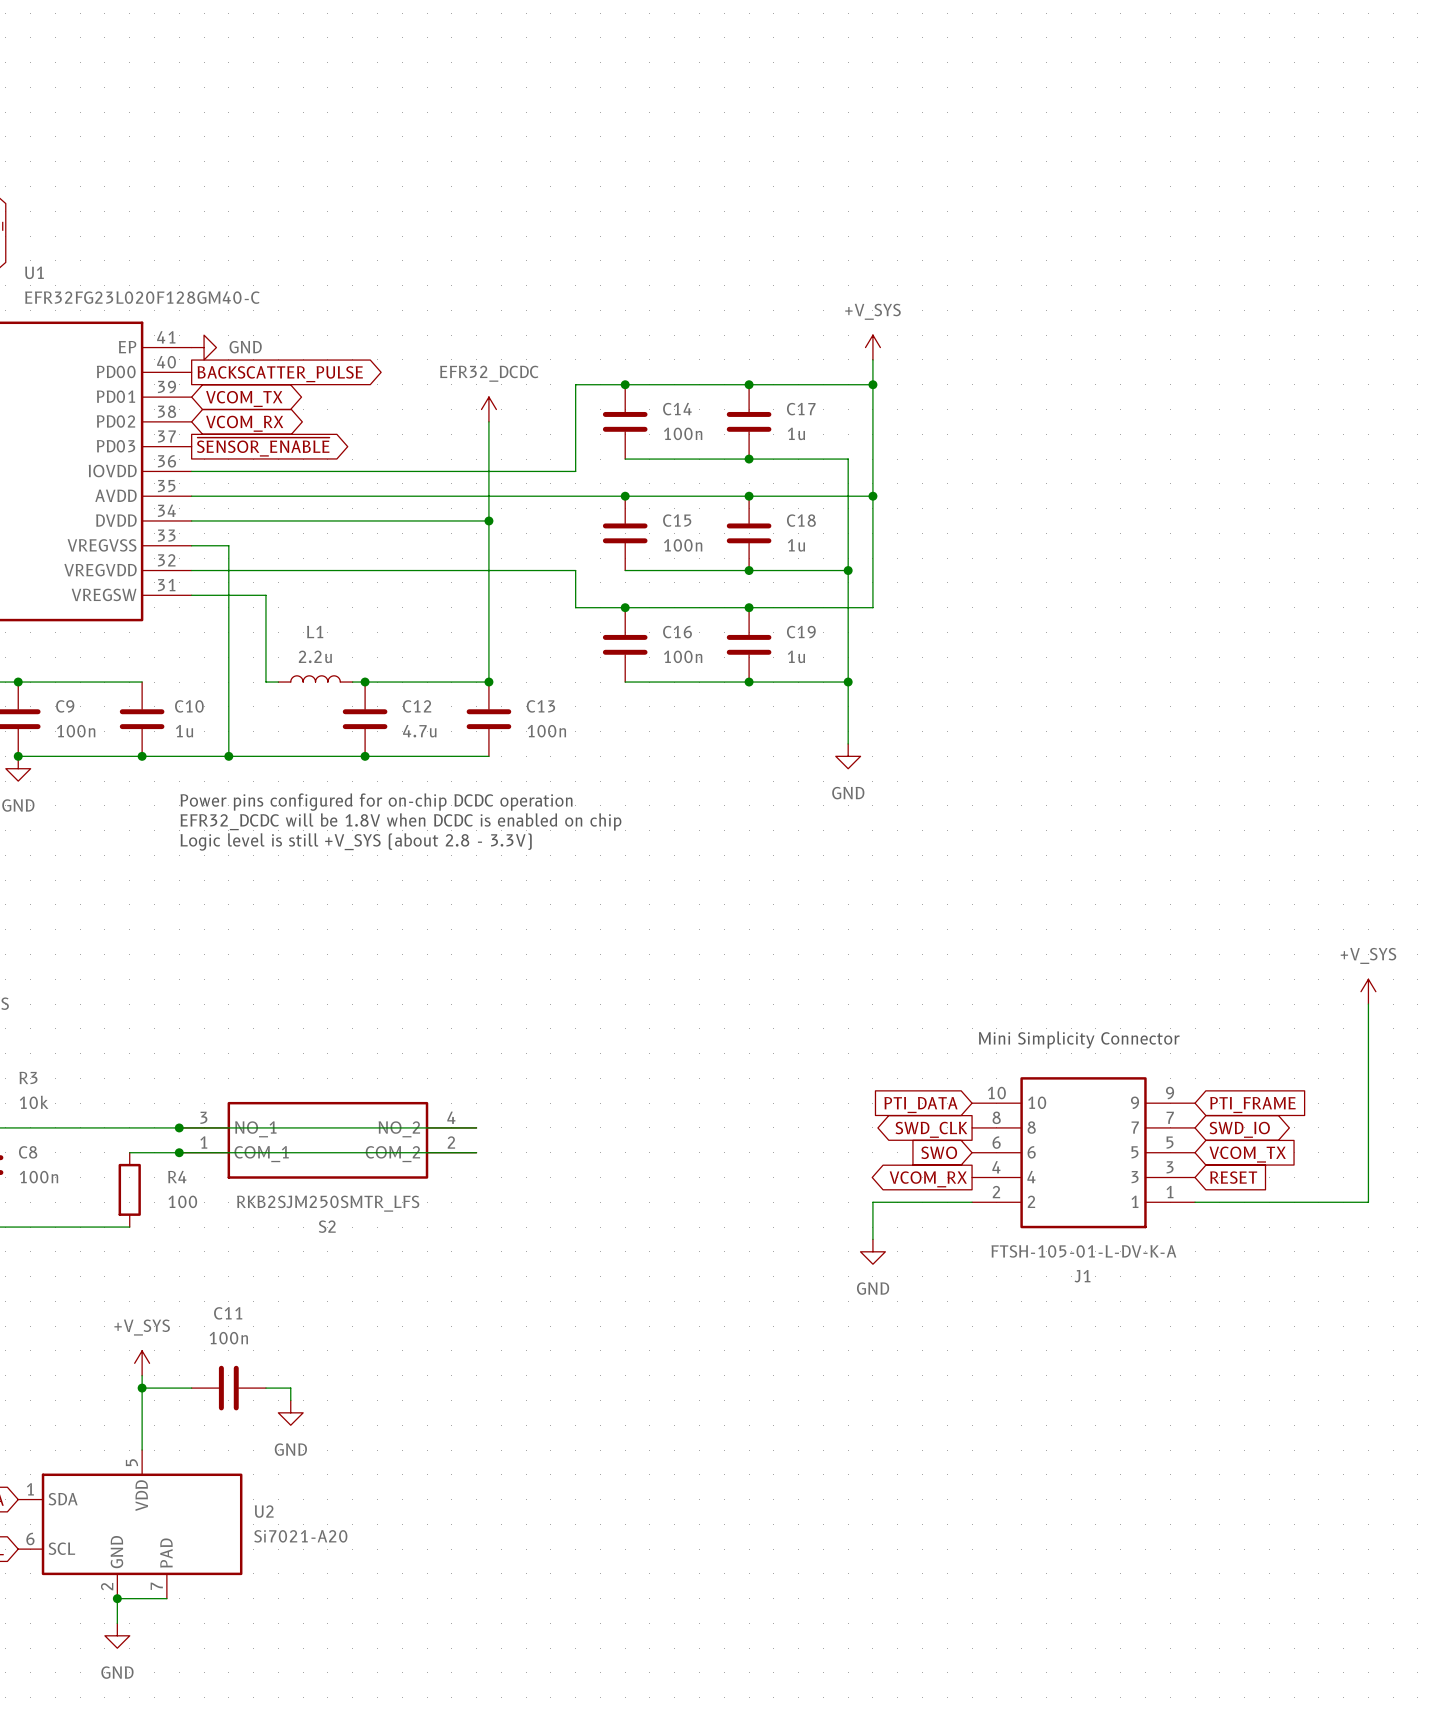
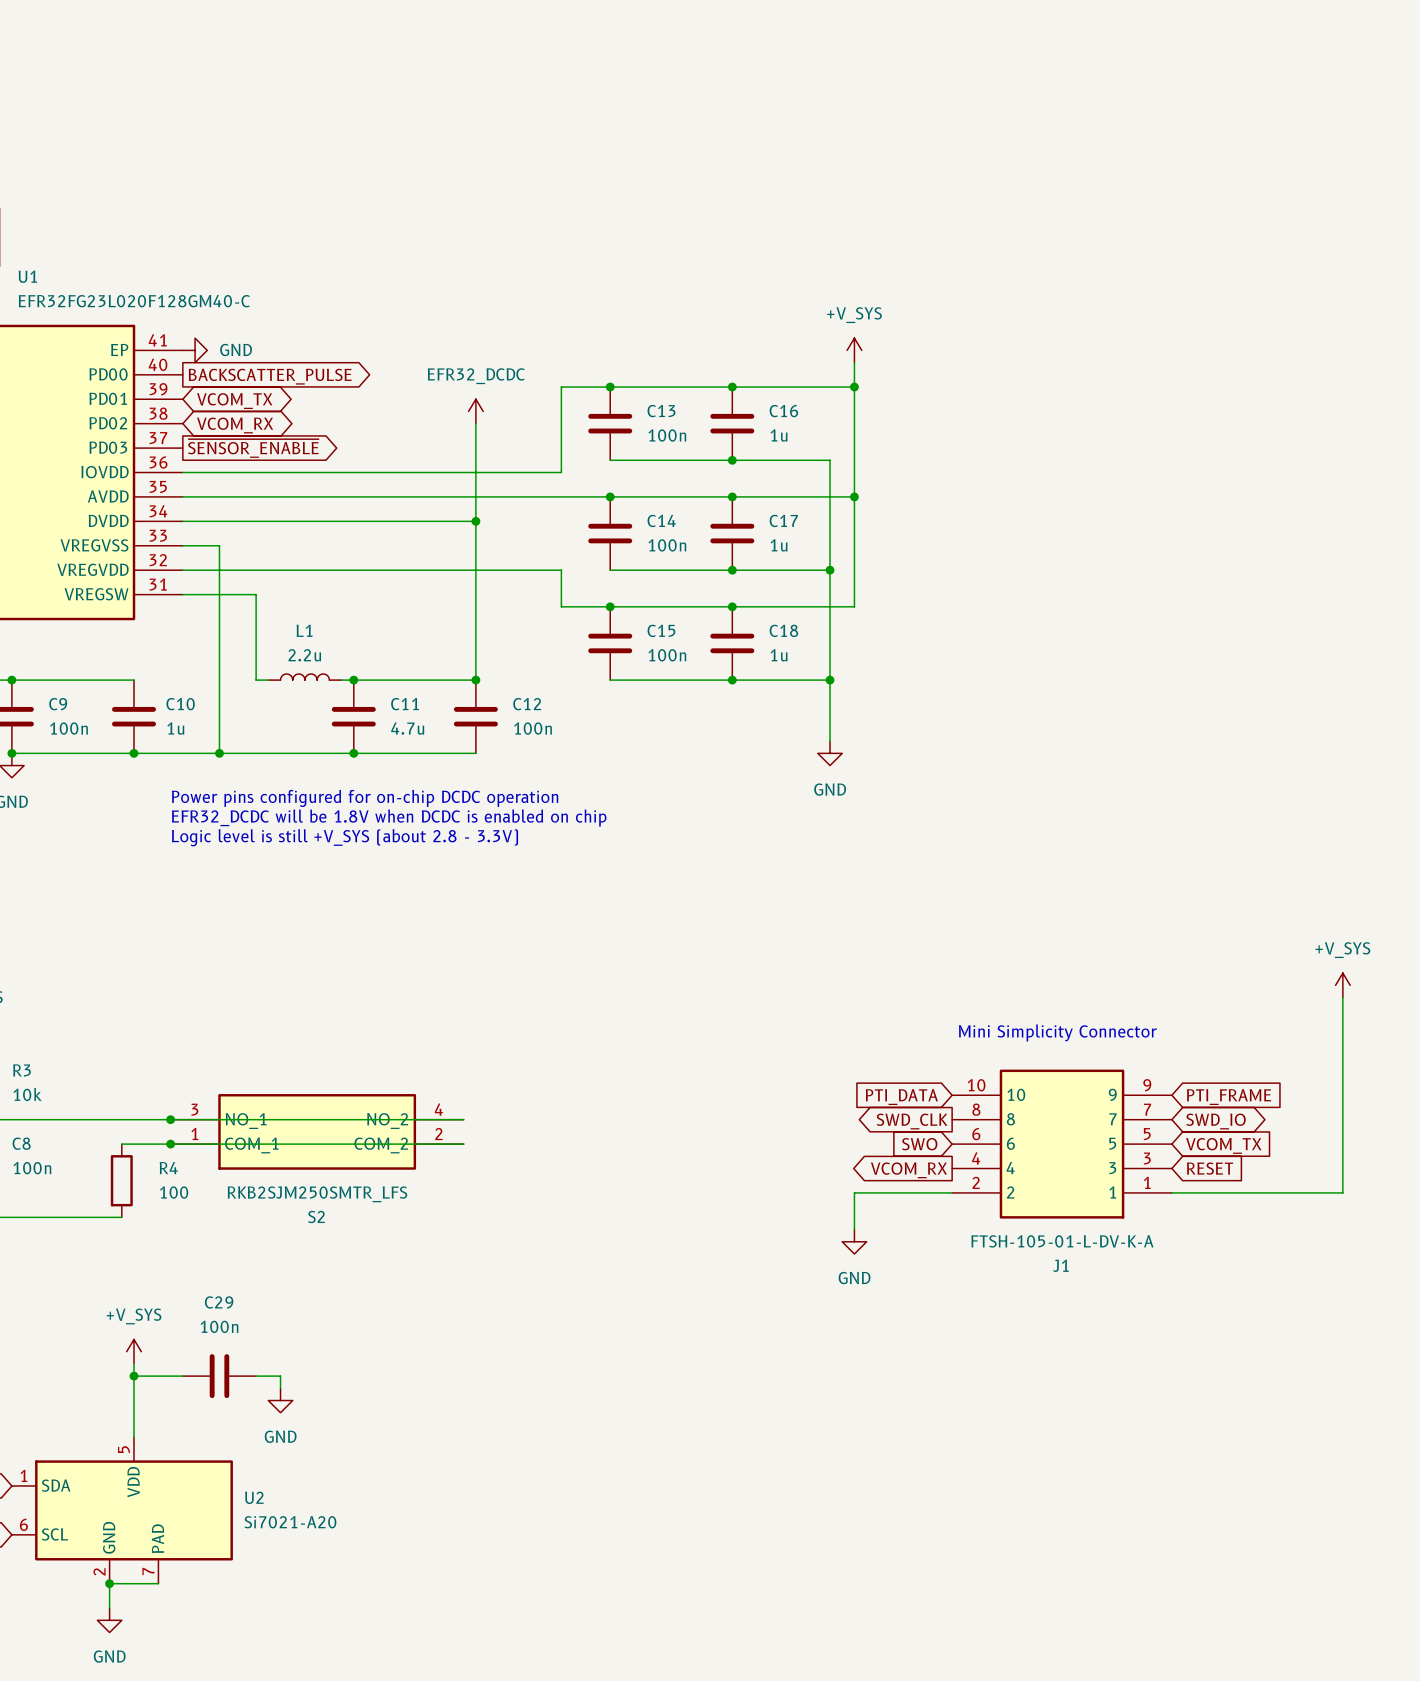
C14 name: C14 (677, 409) -> C13 (661, 411)
C17 name: C17 (801, 409) -> C16 (783, 411)
C15 name: C15 (677, 520) -> C14 (661, 520)
C18 name: C18 (801, 520) -> C17 (783, 520)
C16 name: C16 (677, 632) -> C15 (661, 630)
C19 name: C19 (801, 632) -> C18 (783, 630)
C12 name: C12 (417, 706) -> C11 (405, 704)
C13 name: C13 (540, 706) -> C12 (527, 704)
C11 name: C11 (228, 1313) -> C29 (219, 1302)

